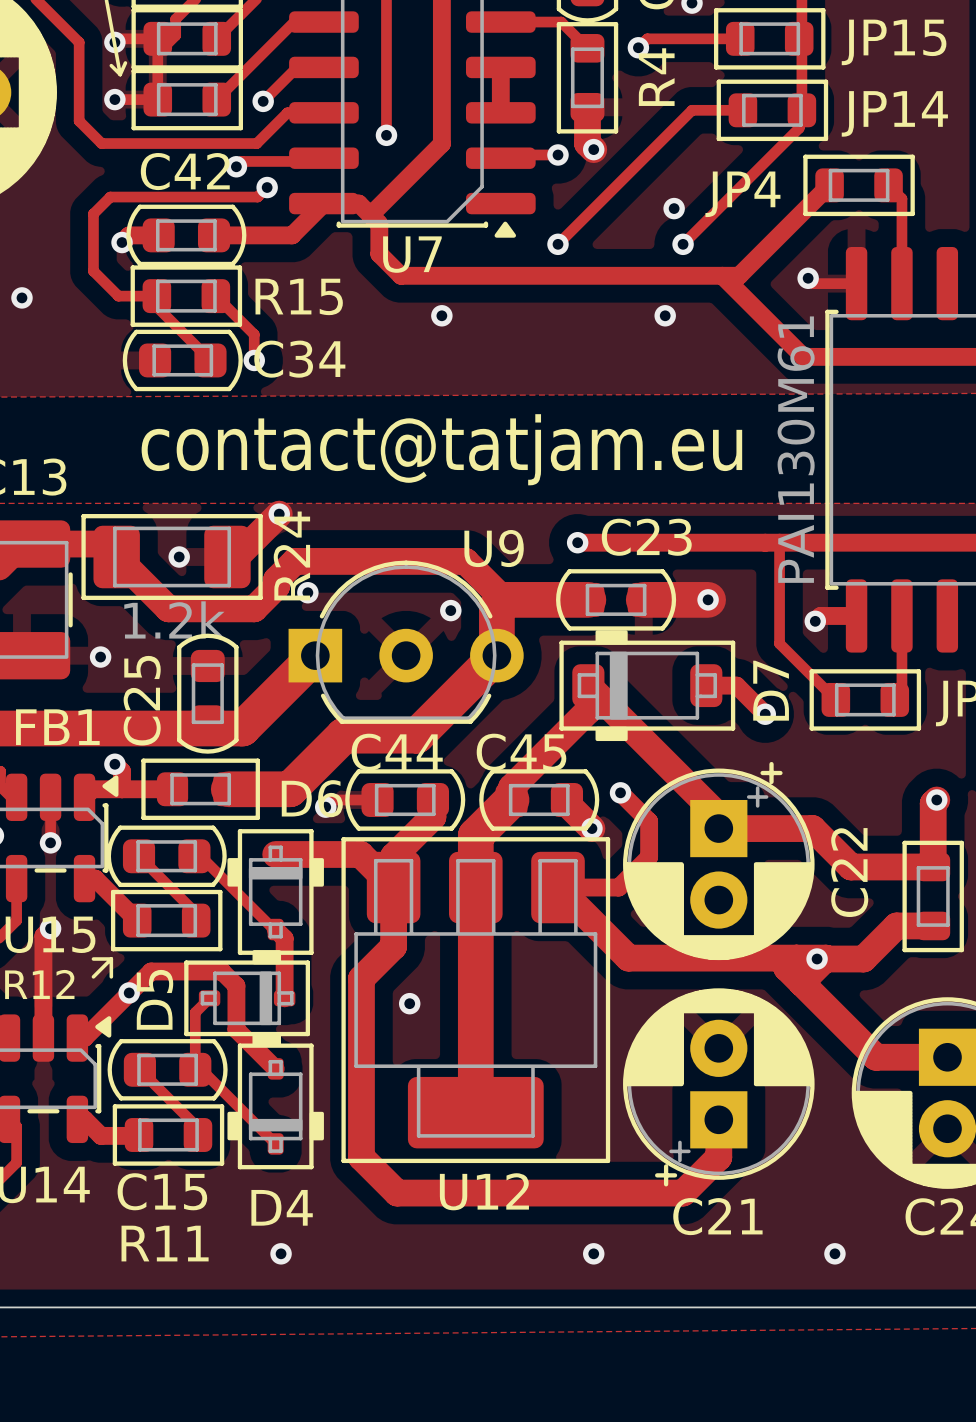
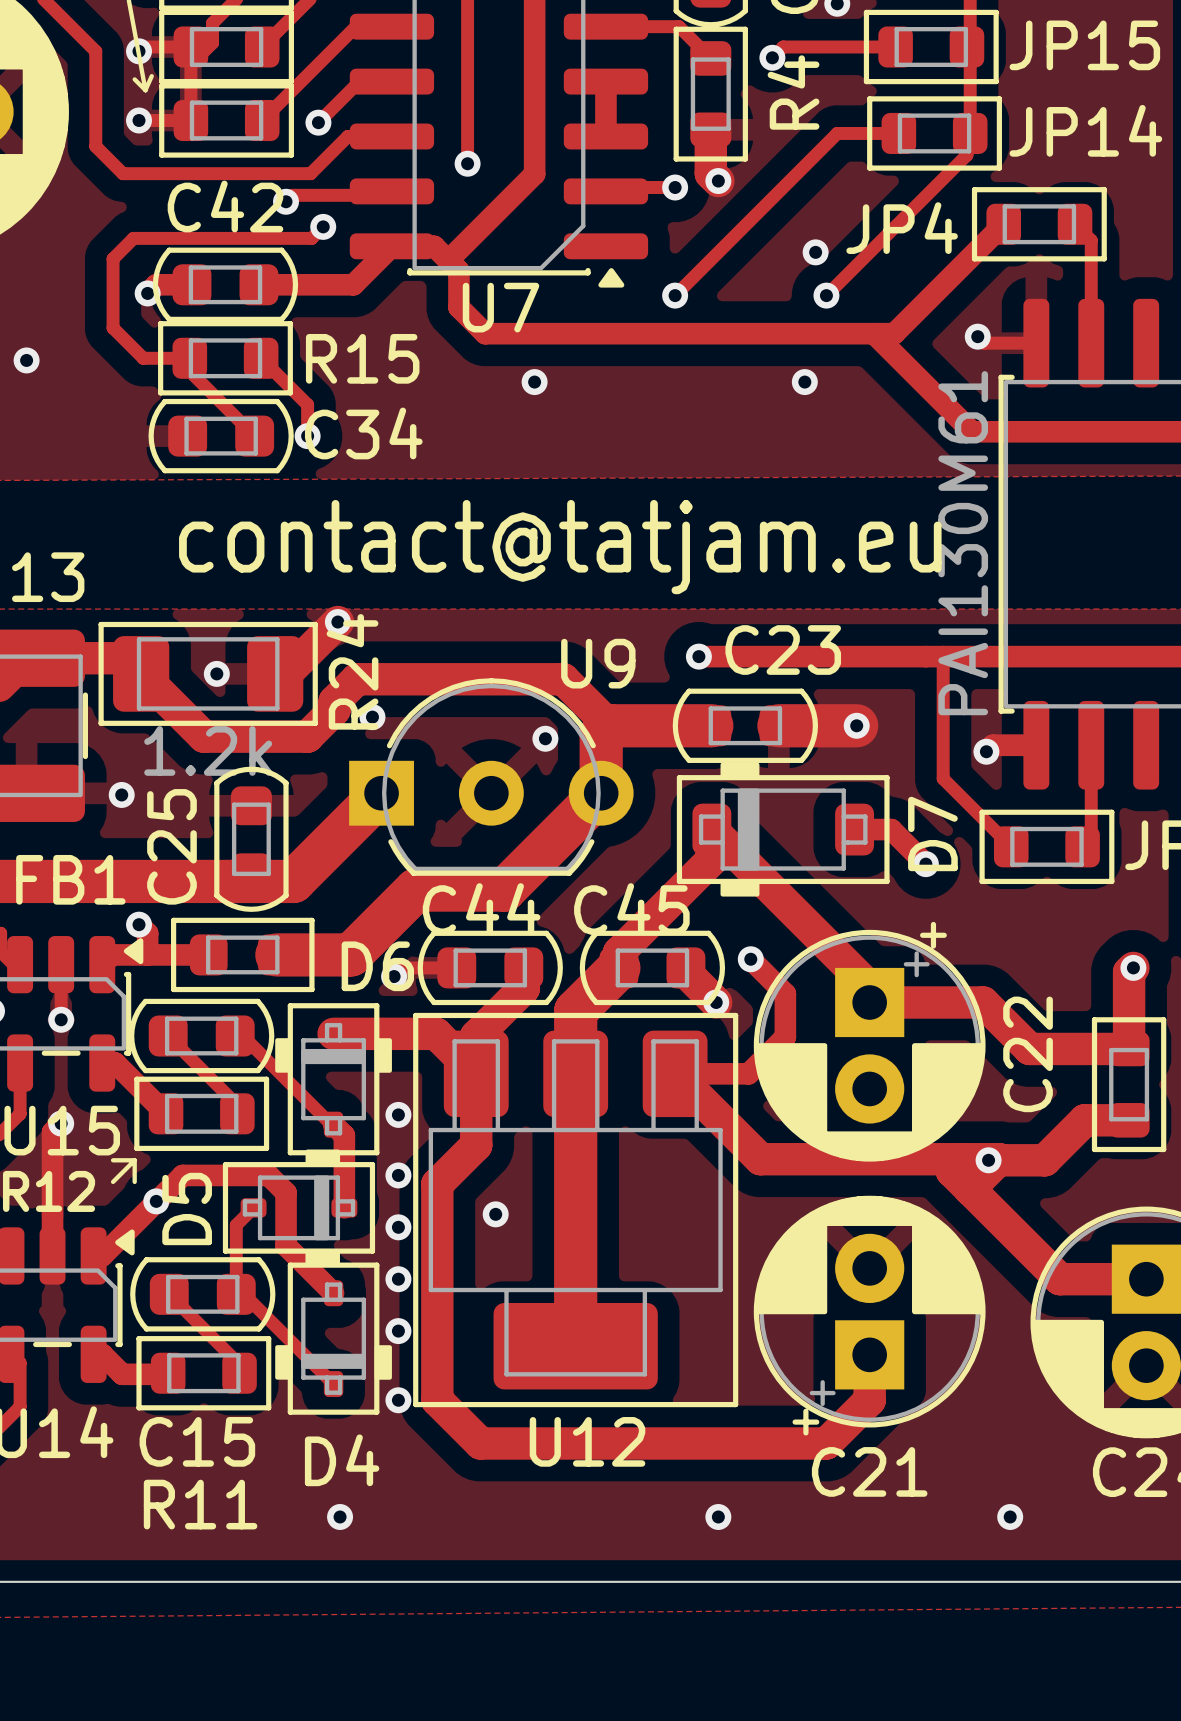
via: none -> (398, 1114)
via: none -> (398, 1175)
via: none -> (398, 1227)
via: none -> (398, 1279)
via: none -> (398, 1331)
via: none -> (398, 1400)

